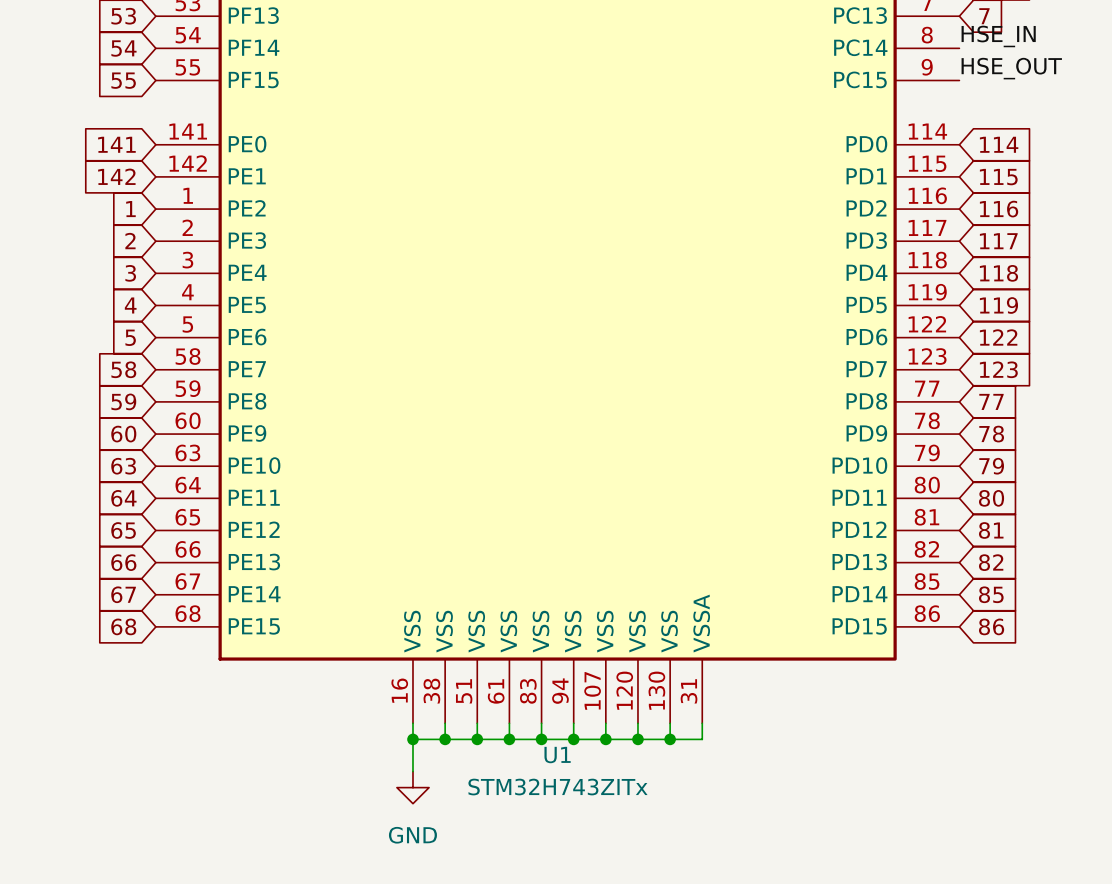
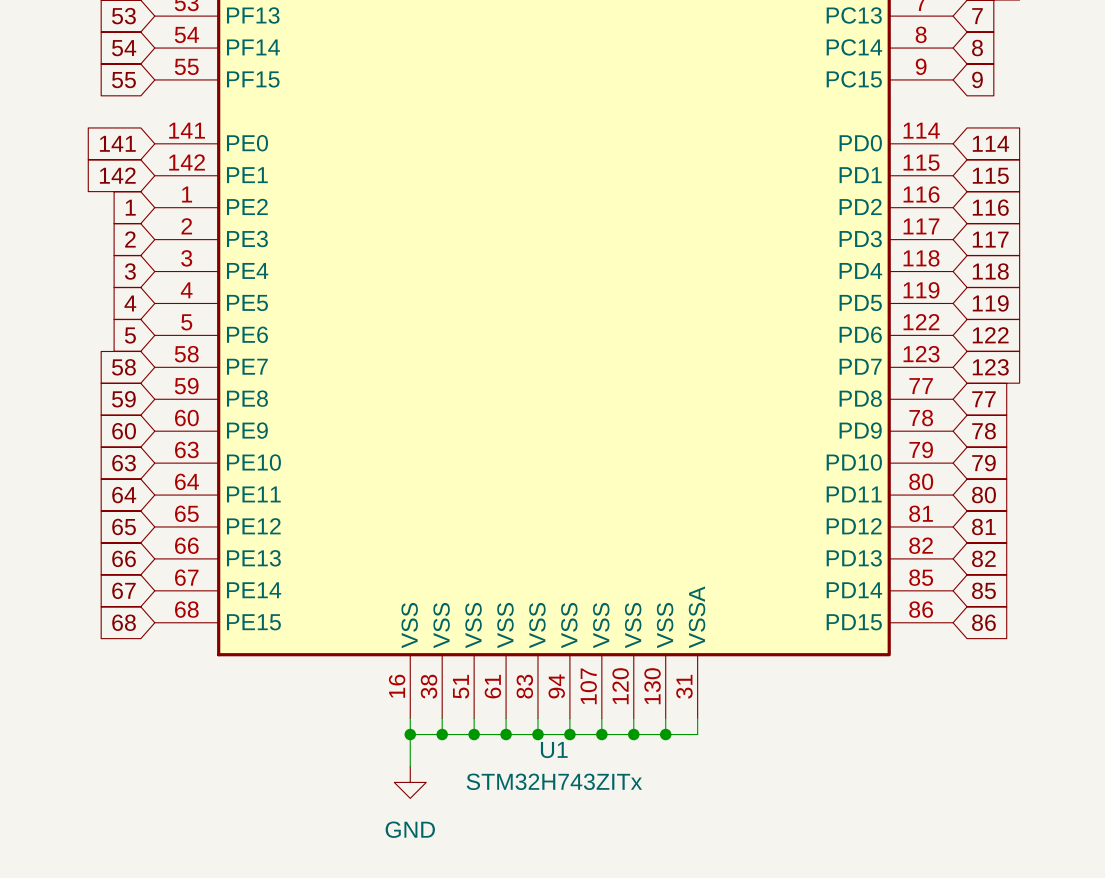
label: HSE_IN (998, 36) -> none
global label: none -> 8 (977, 48)
label: HSE_OUT (1011, 68) -> none
global label: none -> 9 (977, 79)

